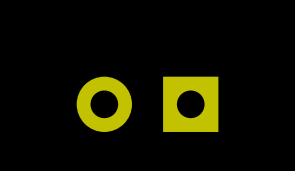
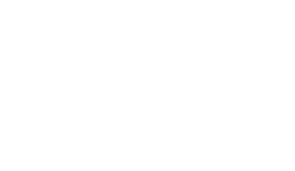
part: (147, 104) -> none

